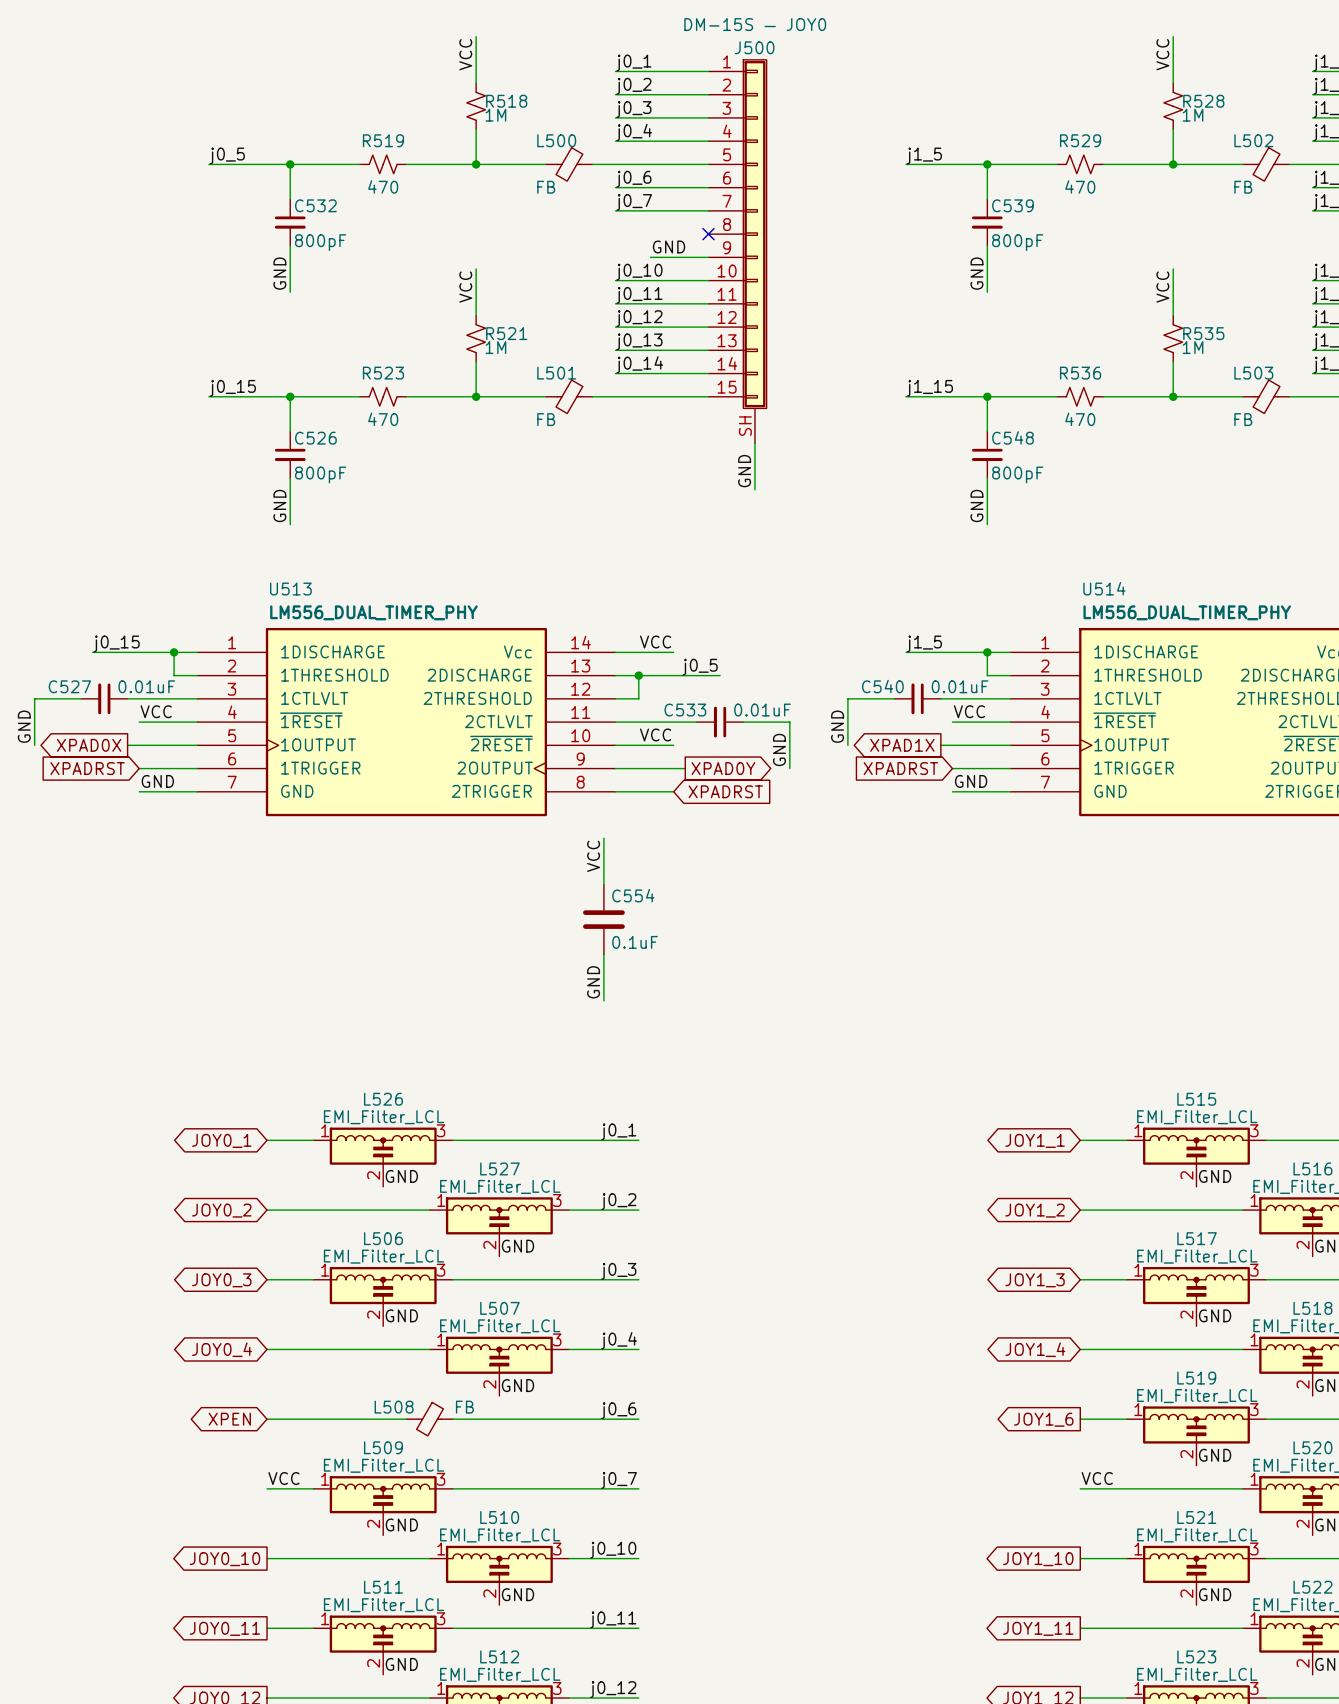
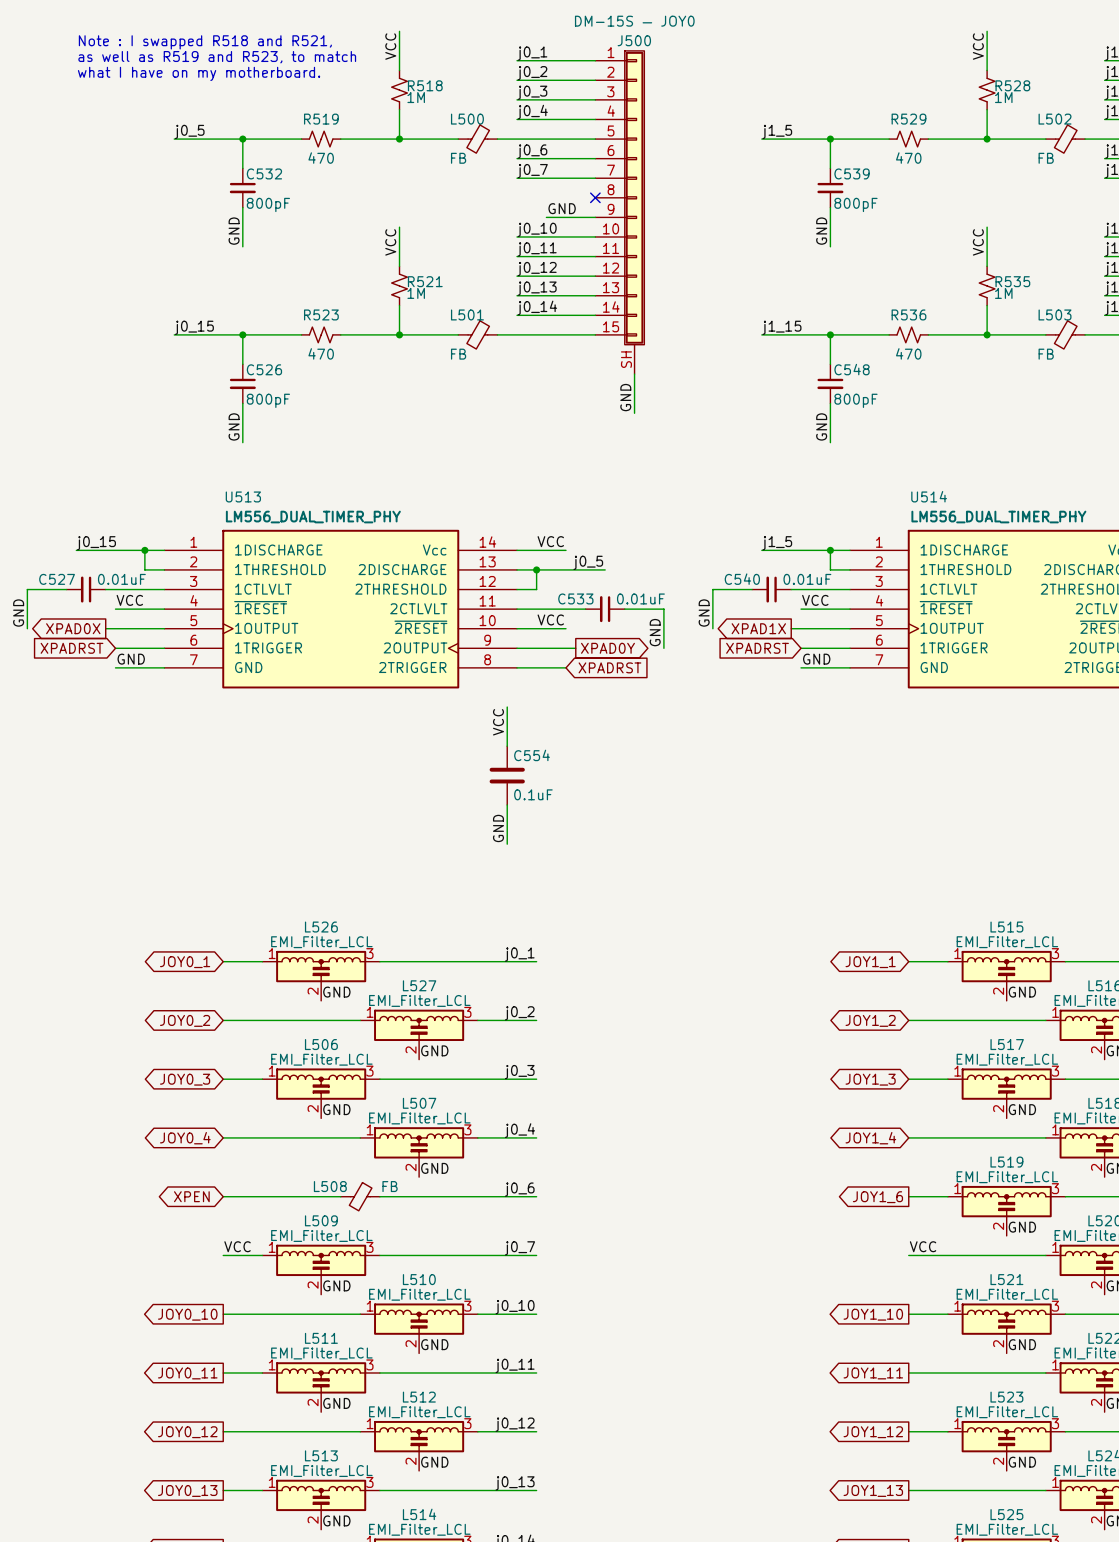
text: none -> Note : I swapped R518 and R521, (205, 42)
text: none -> as well as R519 and R523, to match (217, 57)
text: none -> what I have on my motherboard. (199, 73)

